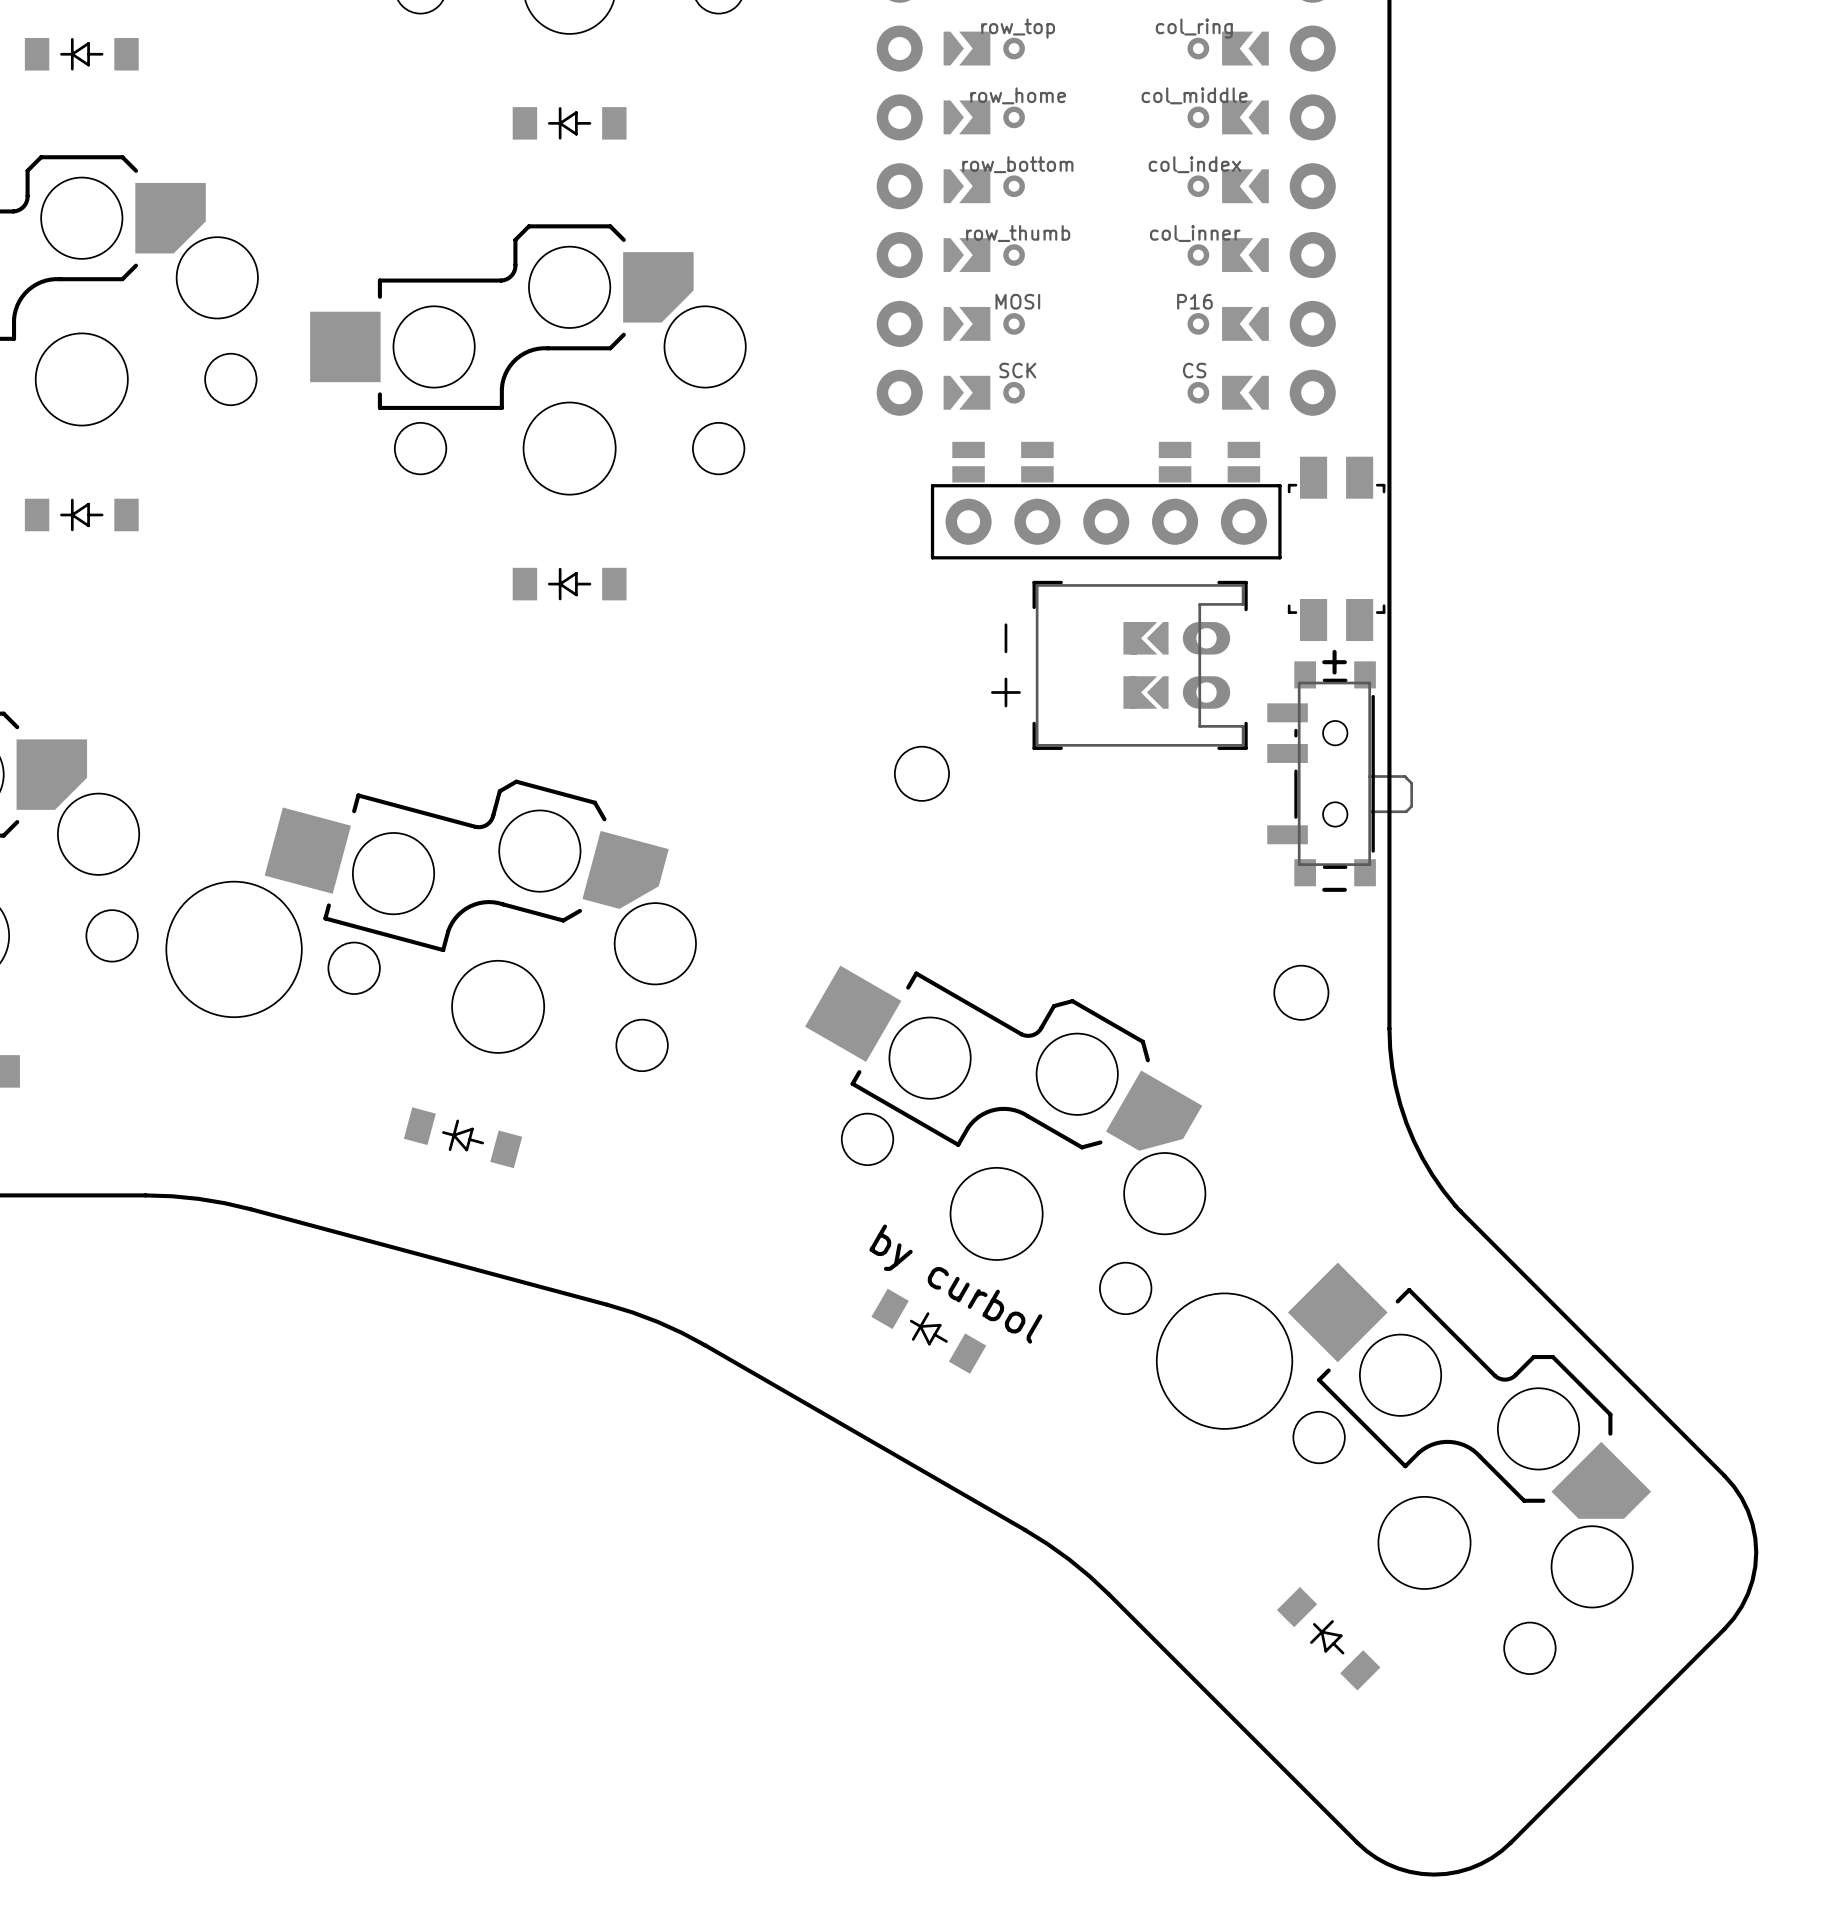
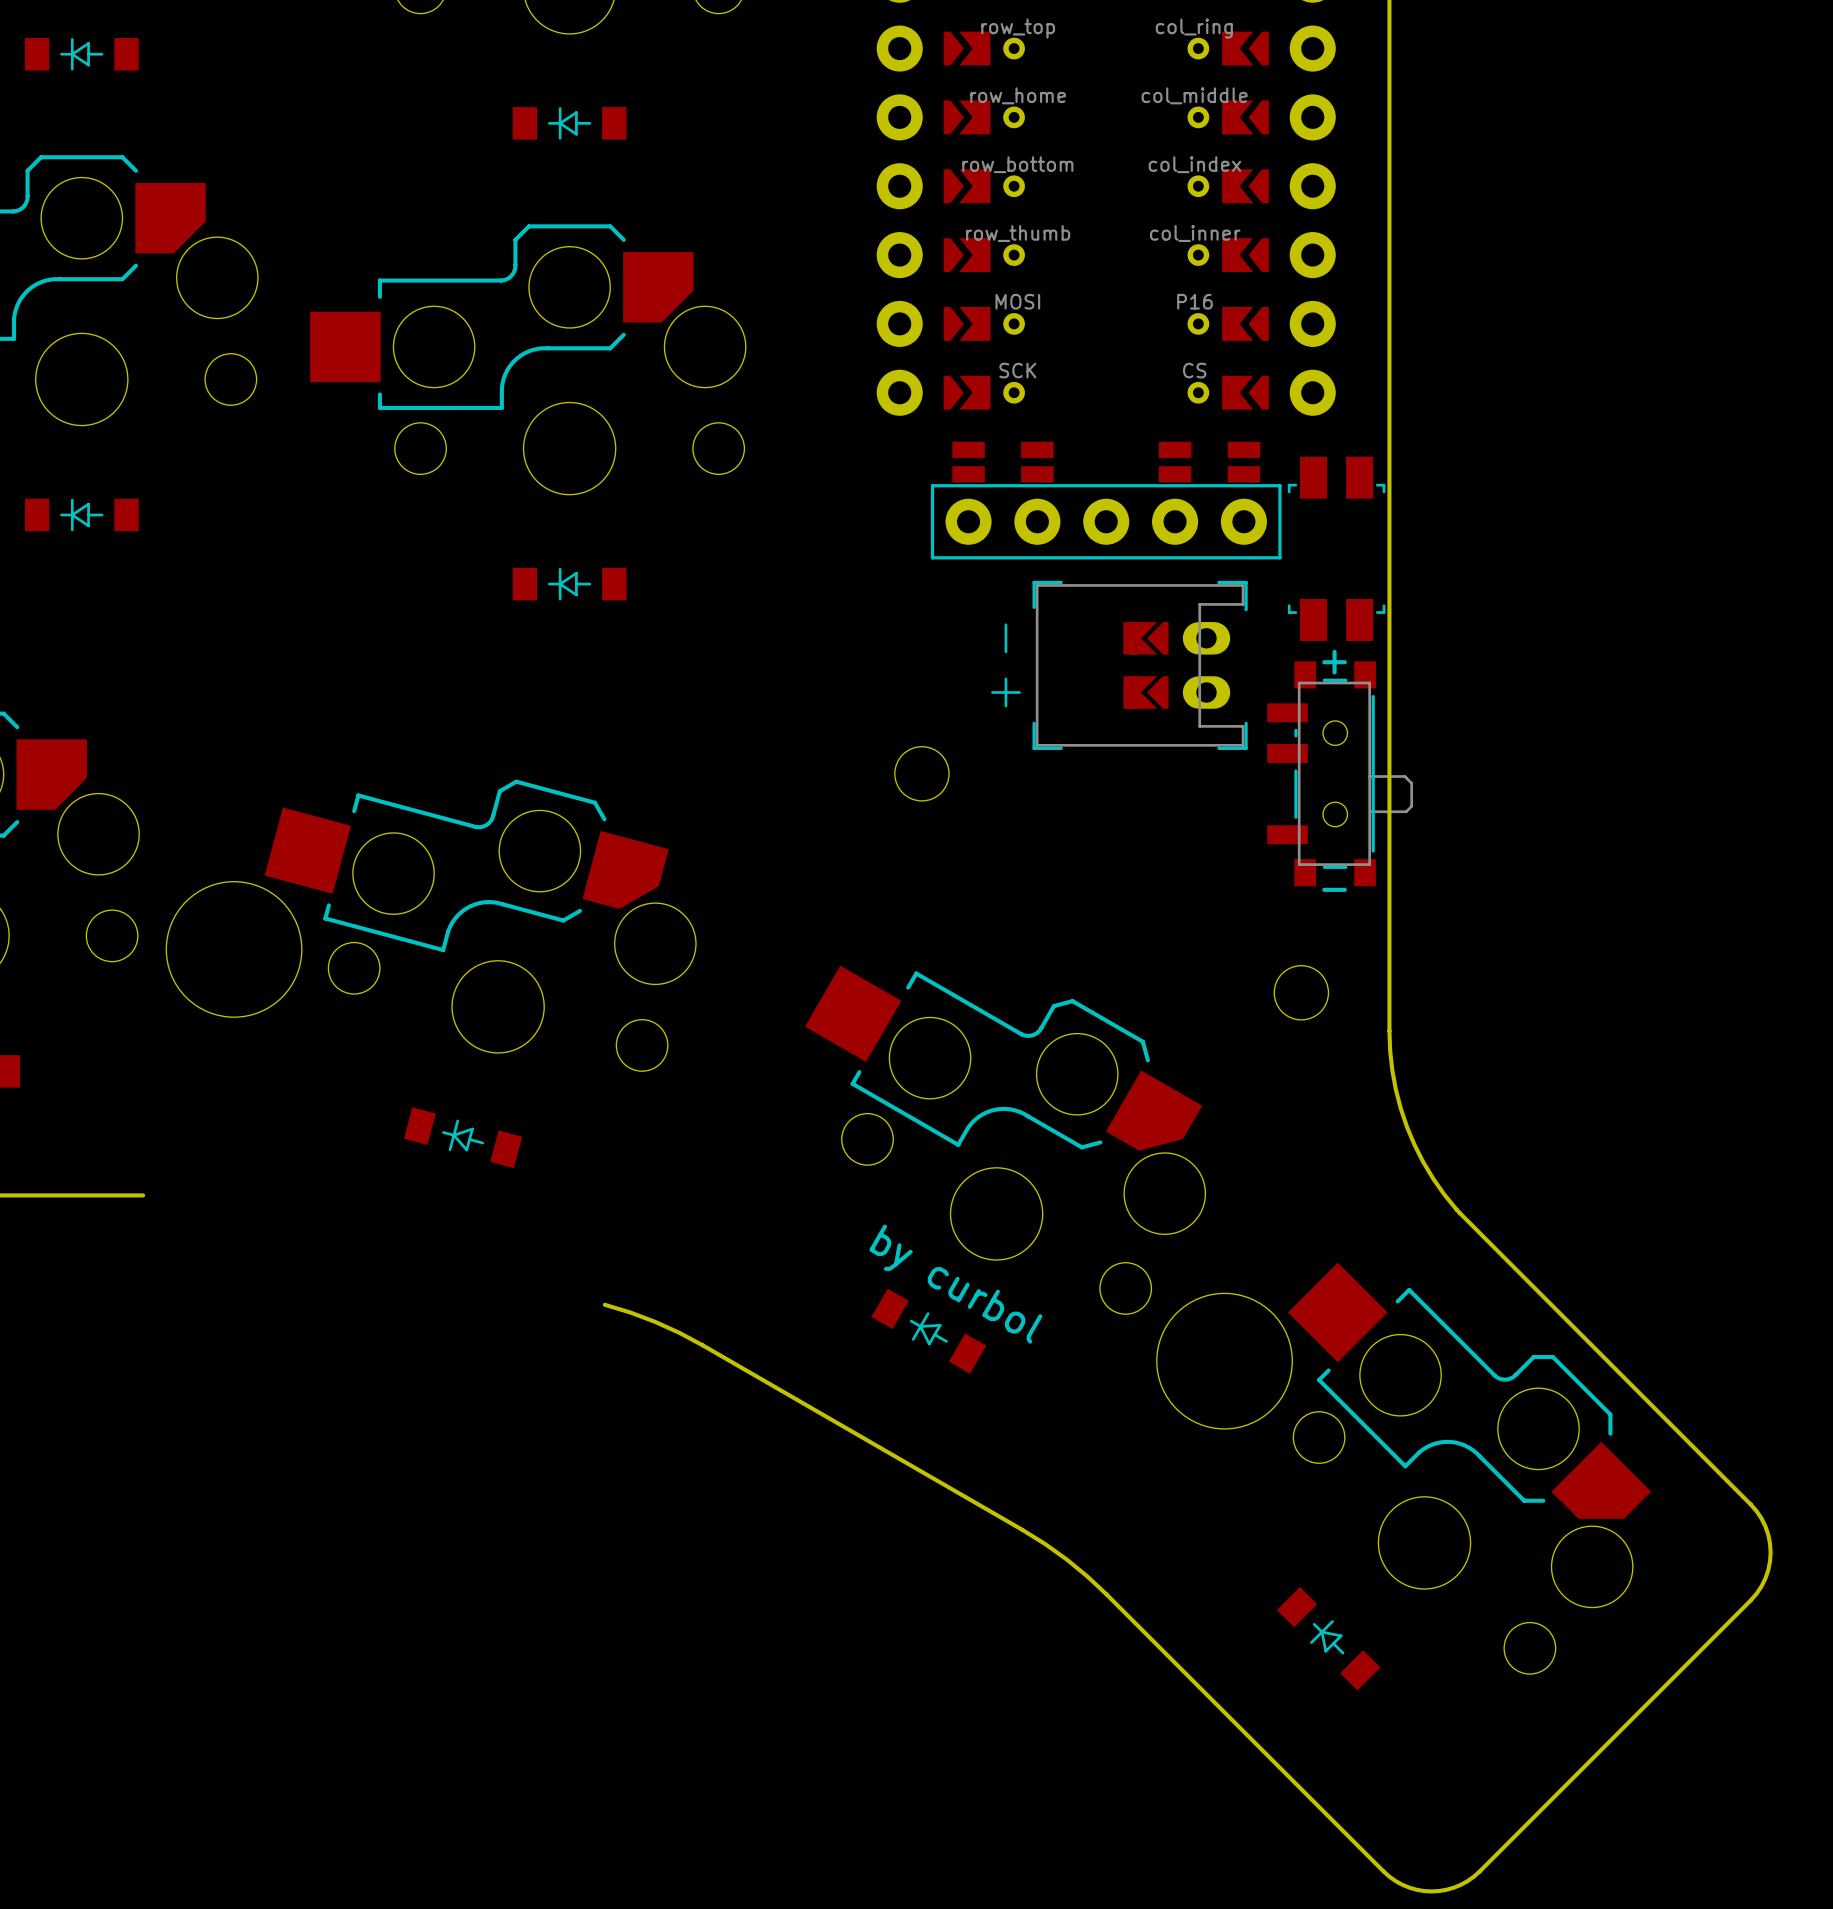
board edge: (1389, 1028) (1392, 1067) (1400, 1104) (1413, 1140) (1443, 1190) (1460, 1211) (1724, 1475) (1741, 1498) (1752, 1524) (1755, 1538) (1756, 1552) (1752, 1580) (1741, 1606) (1724, 1629) (1501, 1850) (1469, 1868) (1446, 1873) (1409, 1871) (1387, 1863) (1366, 1850) (1109, 1594) (1069, 1559) (1047, 1543) (681, 1332) (632, 1312) (607, 1304) (250, 1209) (198, 1198) (143, 1195) -> (1389, 1028) (1392, 1069) (1400, 1108) (1423, 1161) (1444, 1194) (1459, 1212) (1750, 1504) (1765, 1526) (1770, 1543) (1770, 1561) (1765, 1578) (1750, 1600) (1479, 1871) (1467, 1881) (1454, 1887) (1439, 1891) (1416, 1889) (1402, 1884) (1389, 1876) (1106, 1594) (1066, 1559) (1045, 1543) (702, 1345) (655, 1321) (604, 1304)

